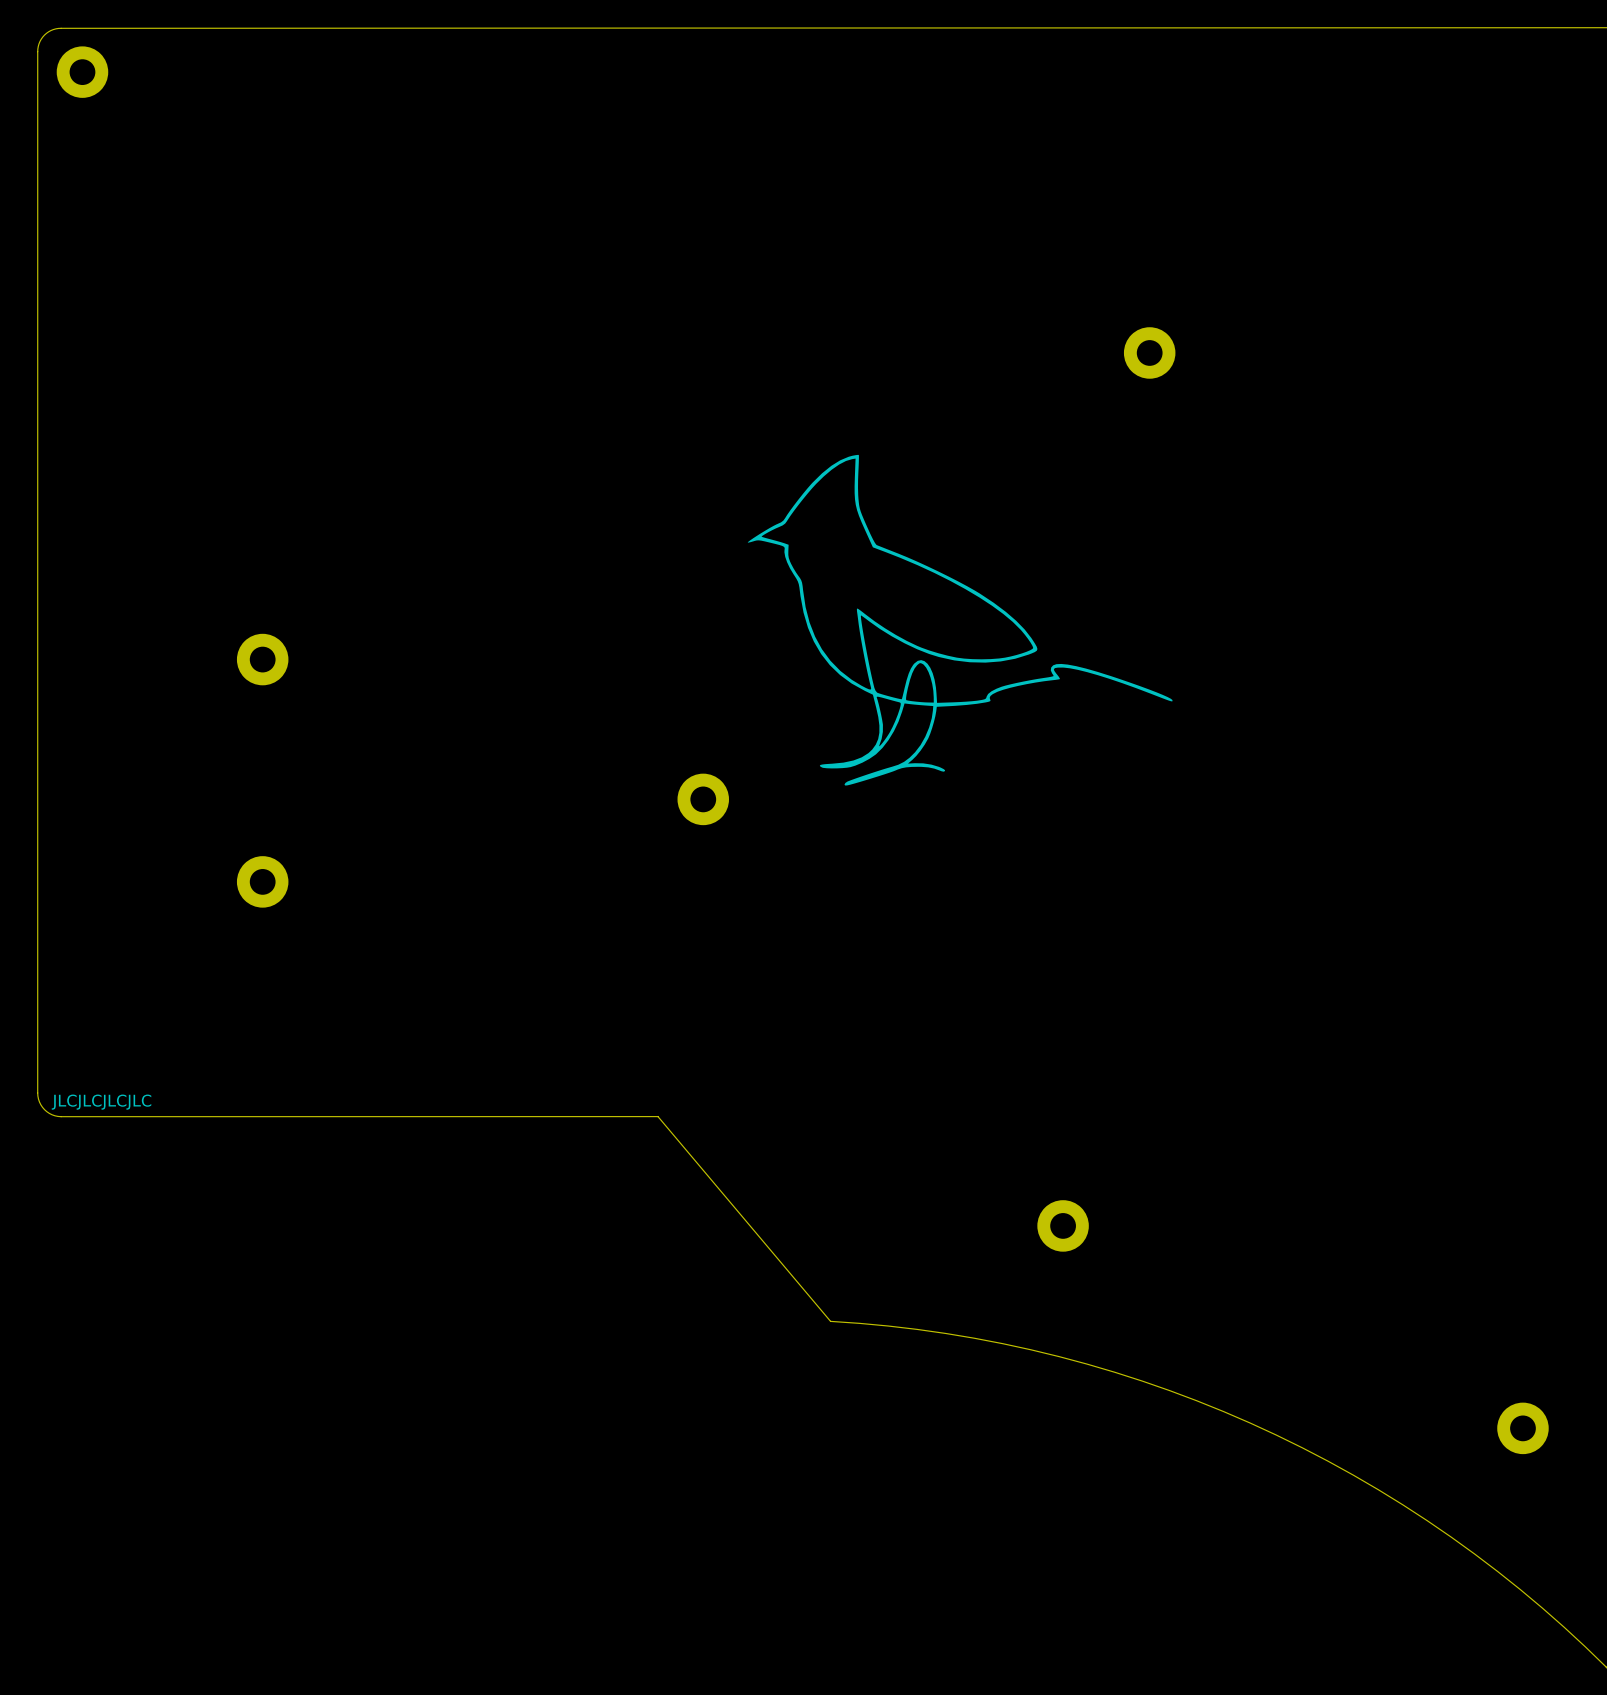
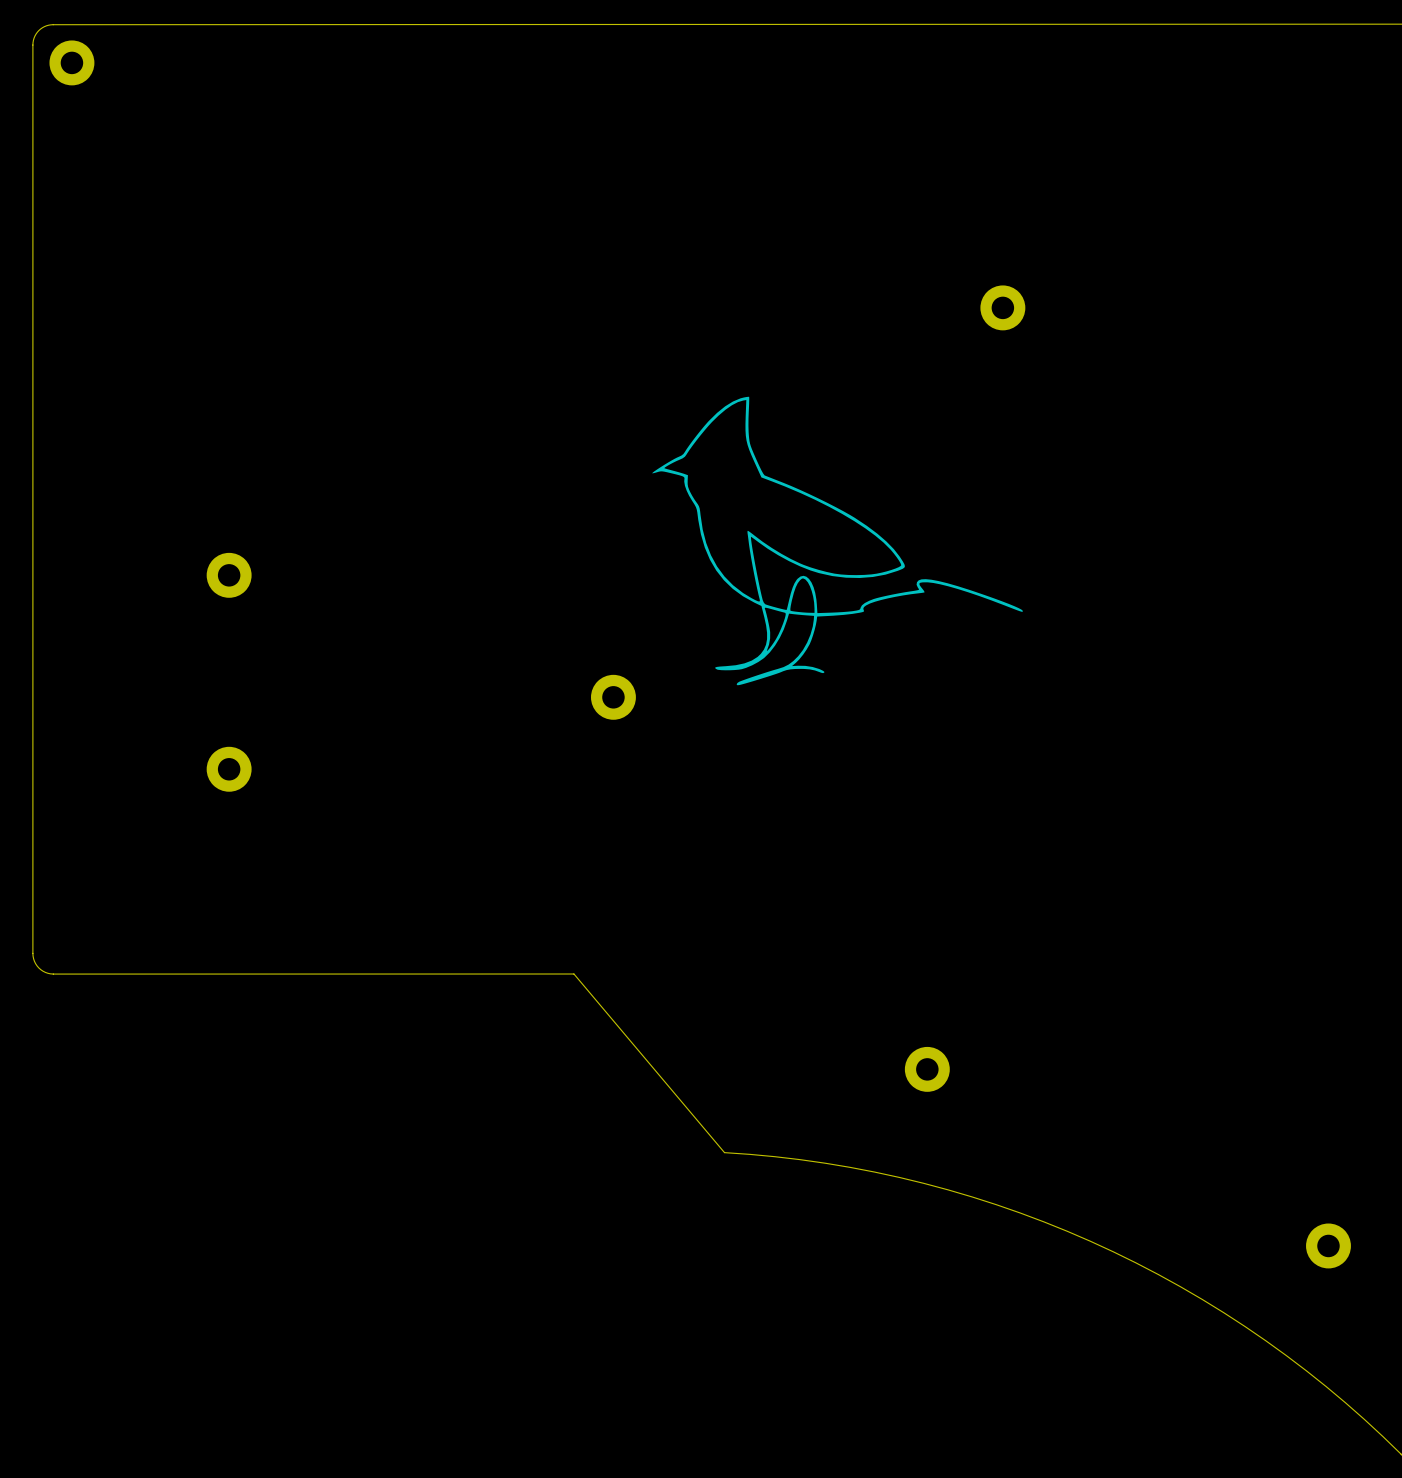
text: JLCJLCJLCJLC (101, 1102) -> none

